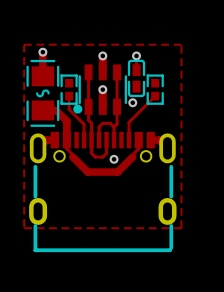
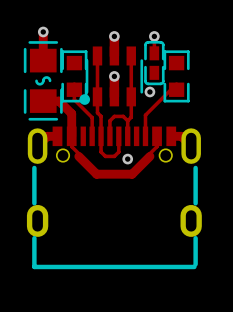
zone outline: (24, 44) (181, 44) (181, 228) (24, 228) (24, 44) -> none
part footprint: [60, 74, 78, 105] -> [61, 50, 88, 103]
part footprint: [146, 74, 164, 105] -> [163, 50, 190, 103]

